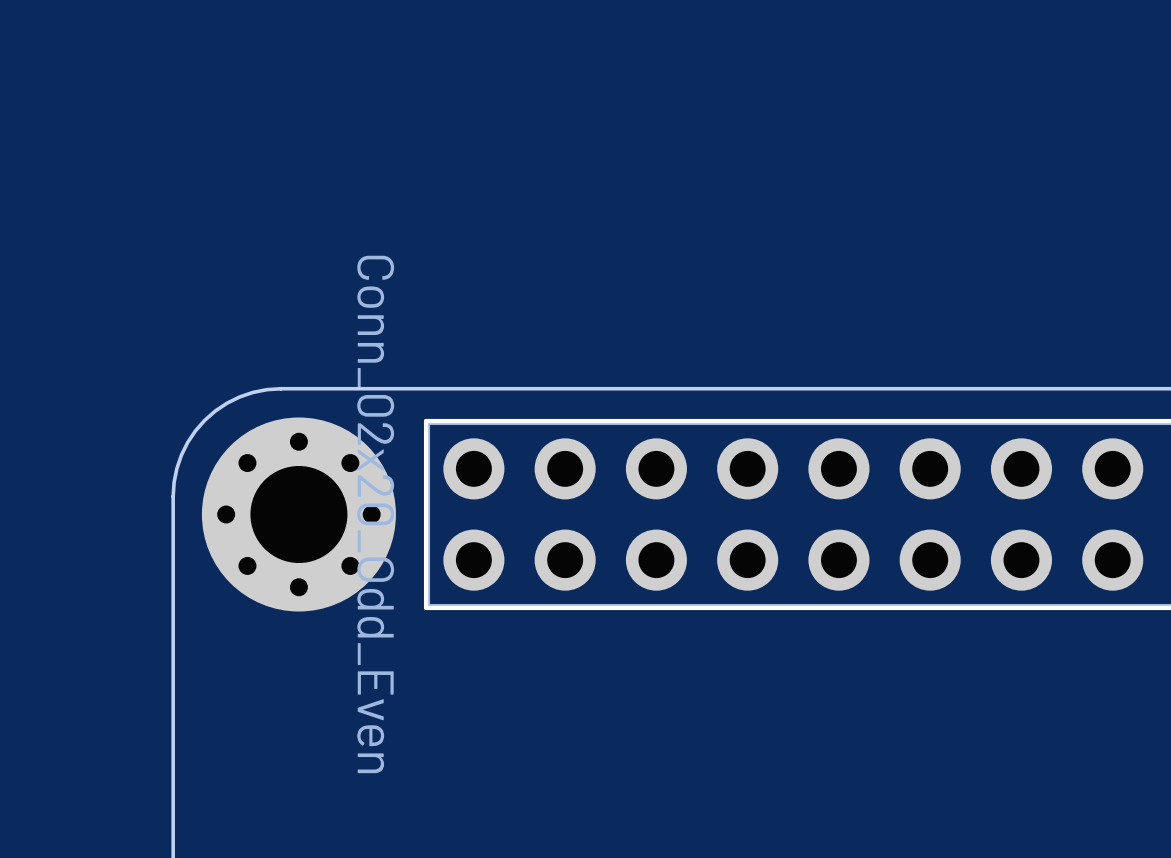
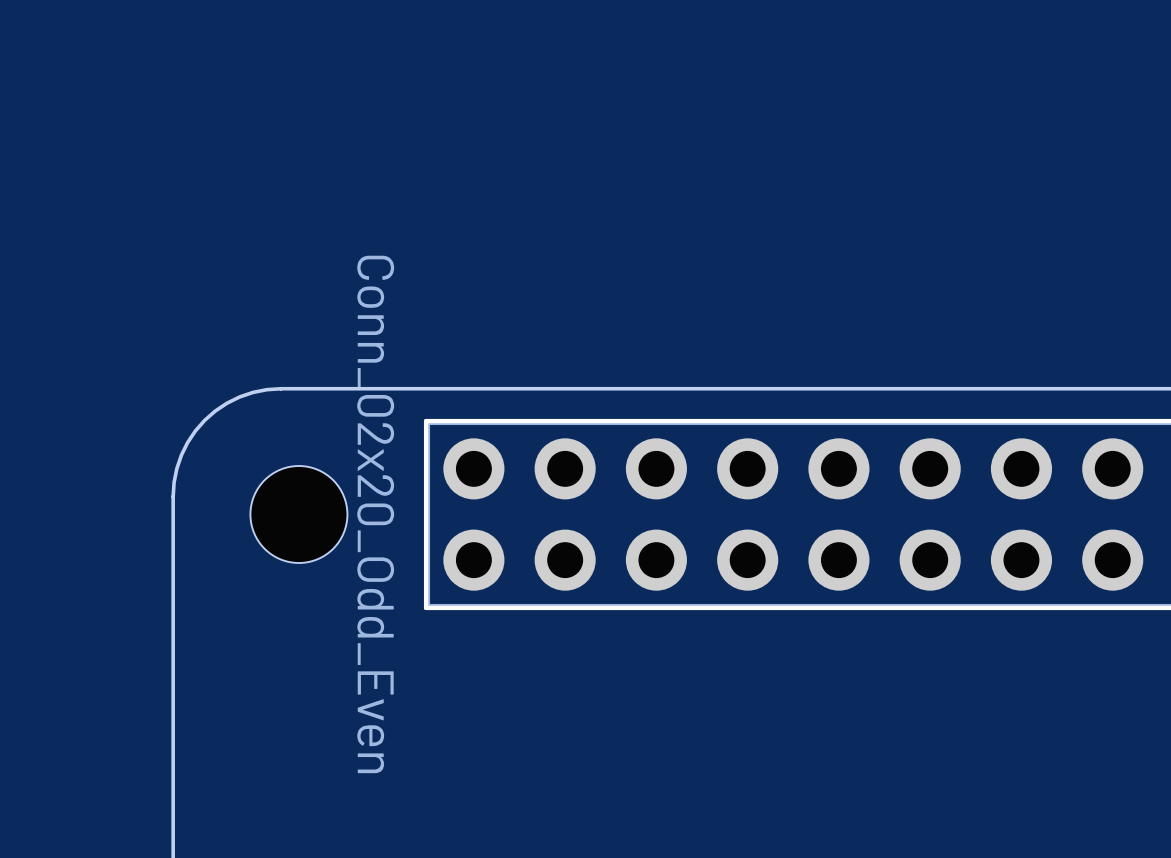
part footprint: [201, 417, 396, 612] -> [250, 465, 348, 564]

